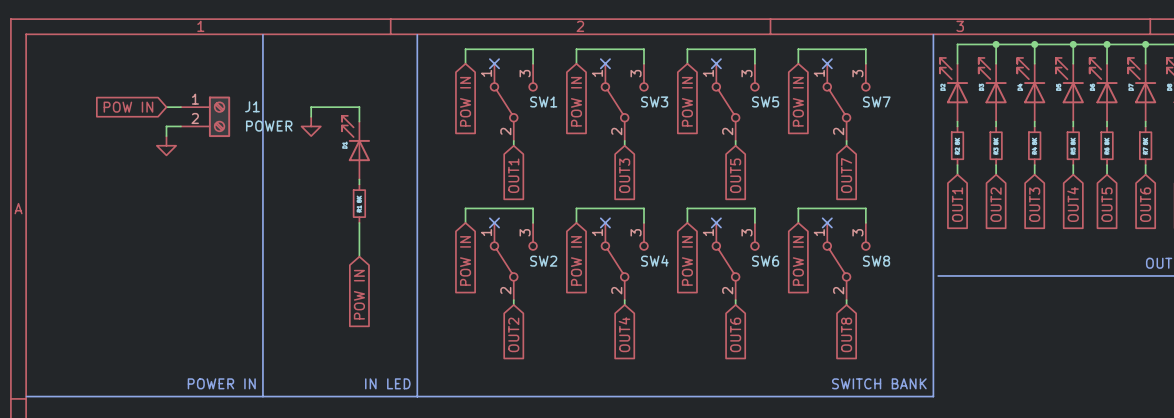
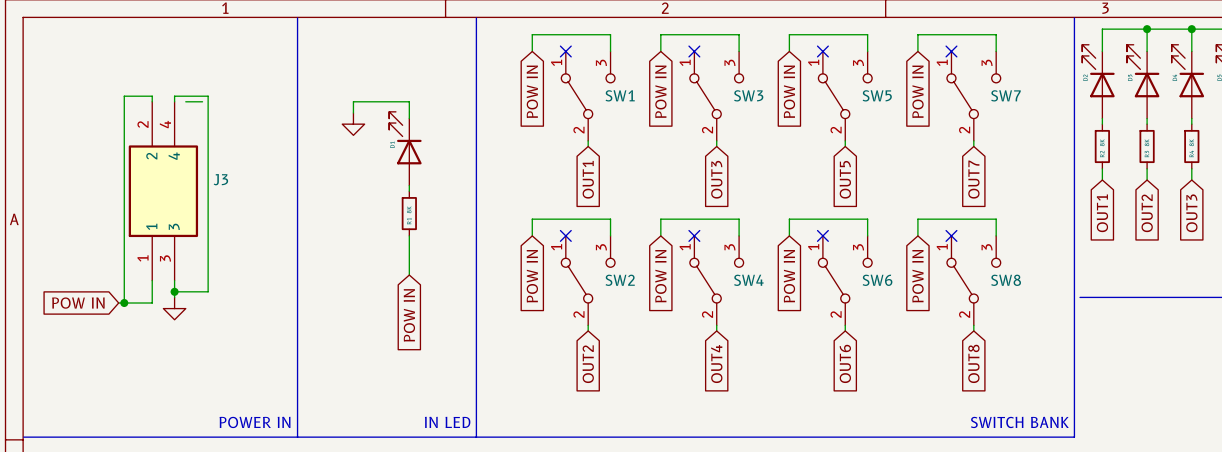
global label position: POW IN (128, 107) -> POW IN (78, 303)
wire: none -> (152, 101) (152, 96) (124, 96) (124, 303)
wire: none -> (174, 101) (174, 96) (208, 96) (208, 291) (174, 291)
J1: POWER (205, 116) -> none
wire: (180, 126) (166, 126) (166, 136) -> none
power symbol position: (166, 145) -> (174, 308)
J3: none -> (163, 191)
wire: none -> (152, 280) (152, 303) (118, 303)
wire: none -> (174, 280) (174, 297)
junction: none -> (174, 291)
junction: none -> (124, 303)

